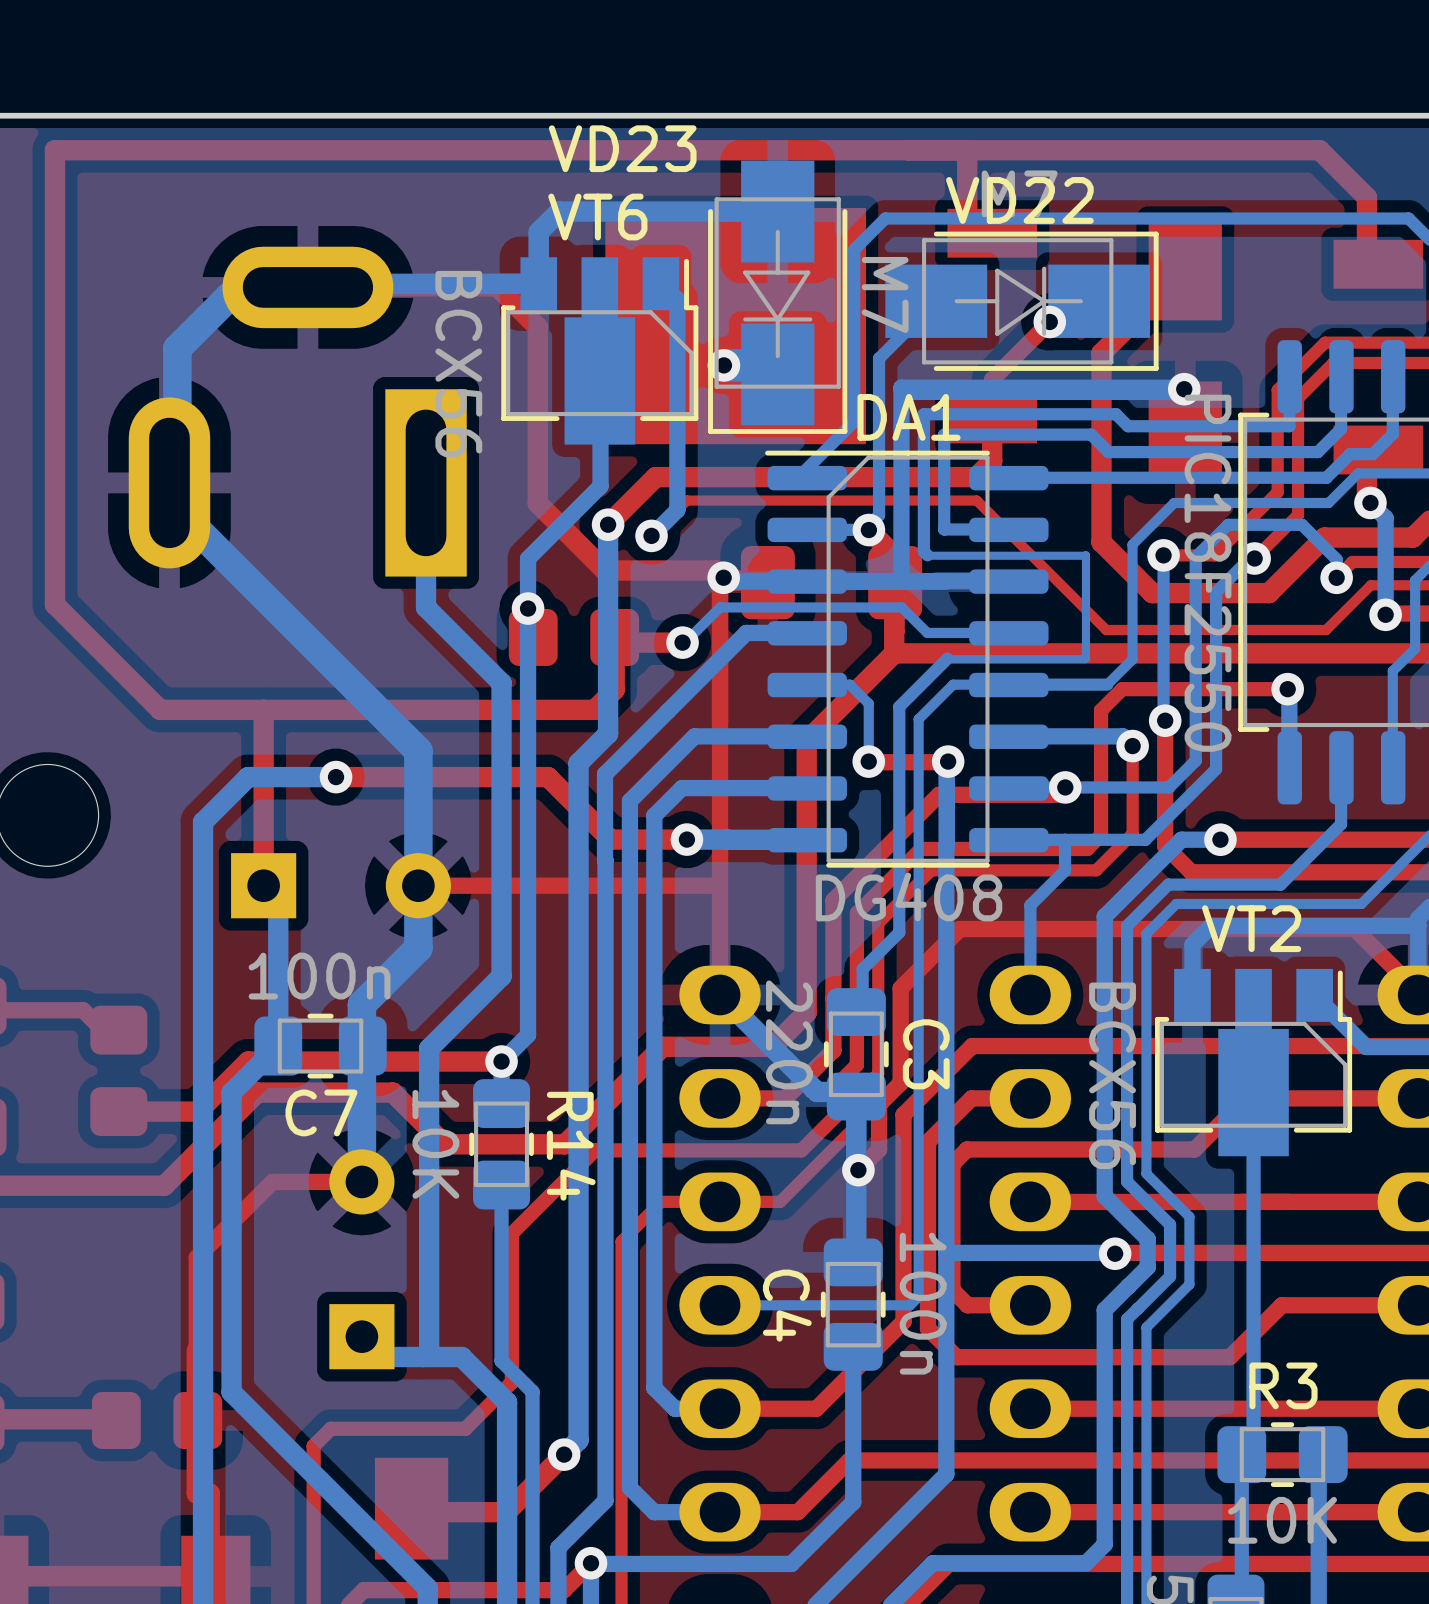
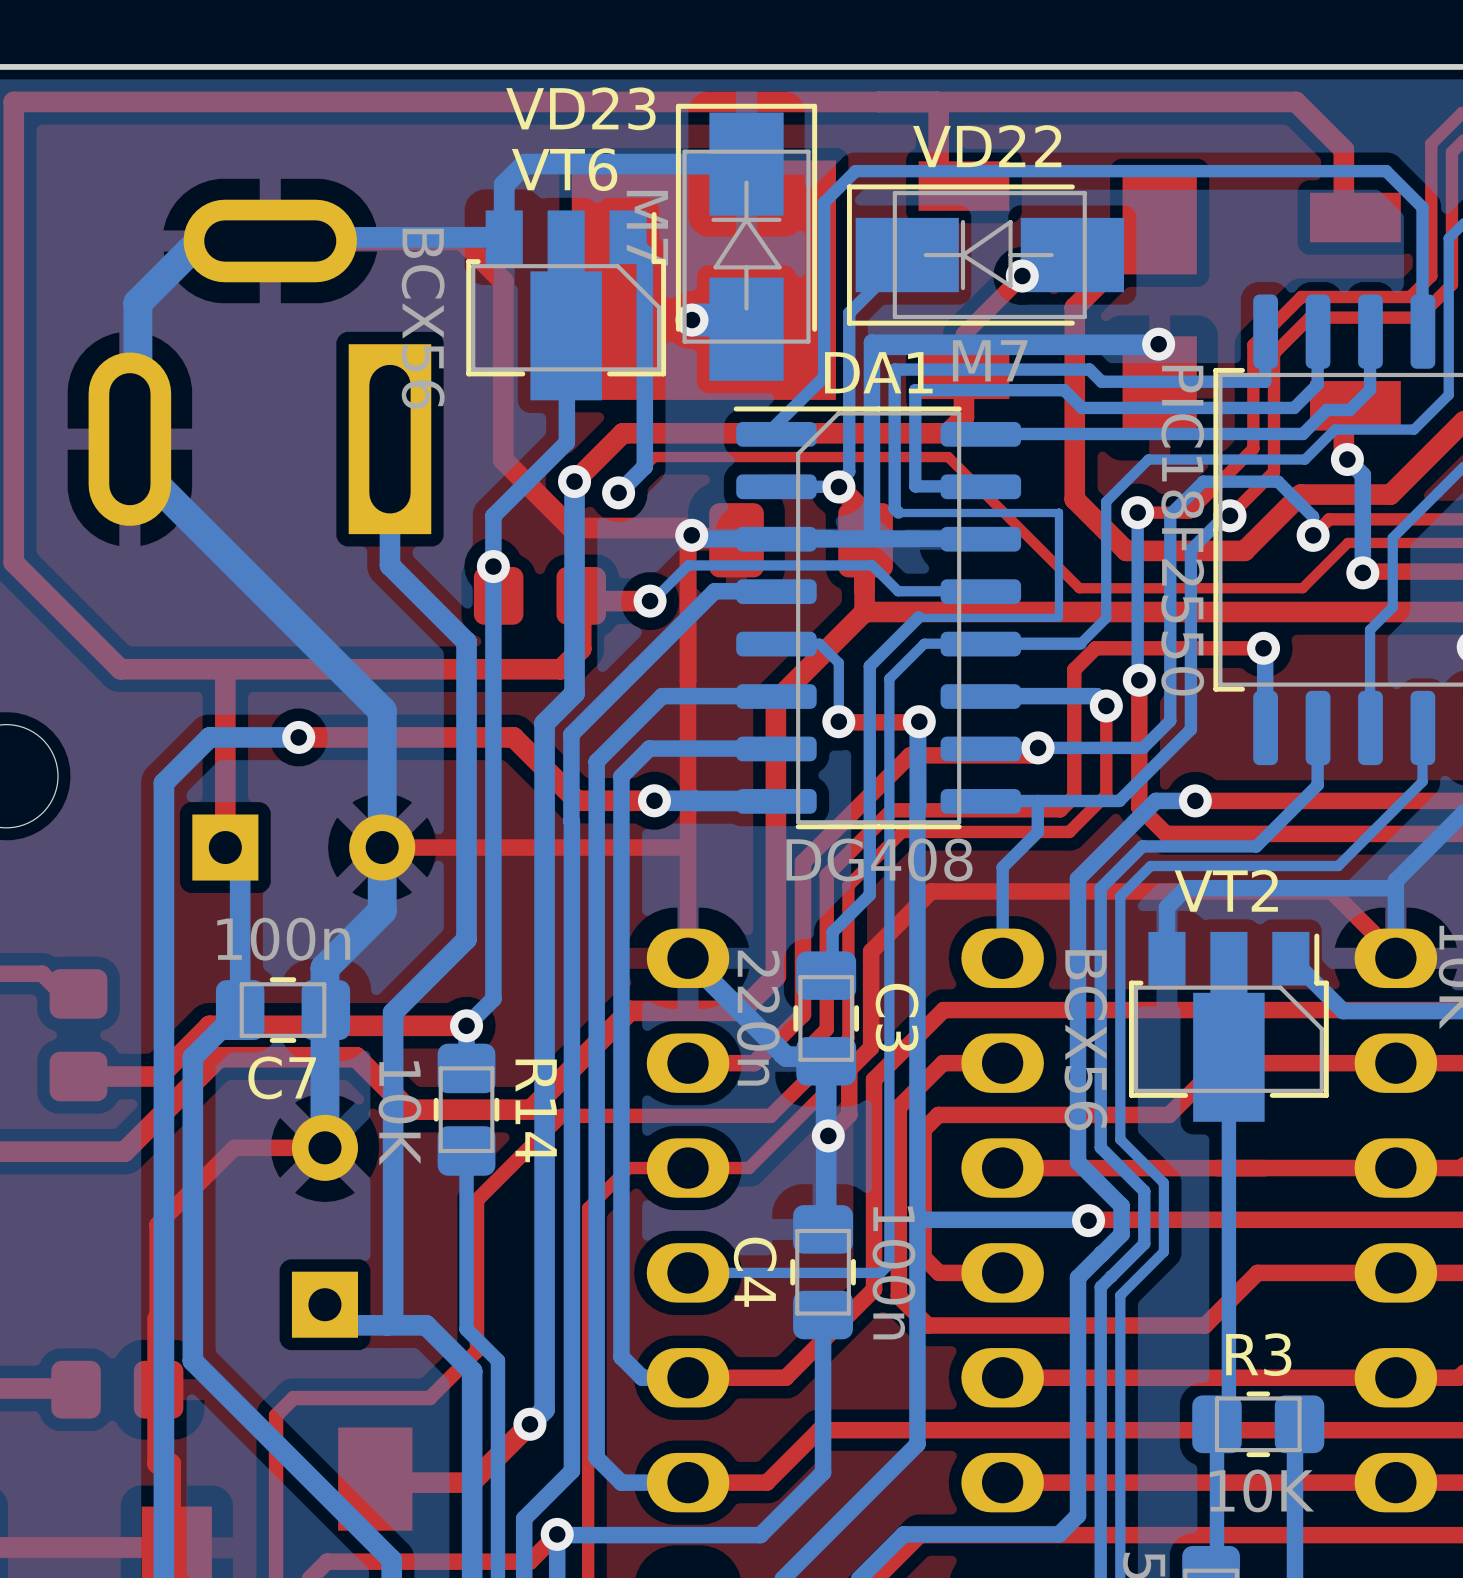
VD23 rotation: 0° (777, 297) -> 180° (746, 242)
VD22 rotation: 0° (1021, 301) -> 180° (985, 255)

